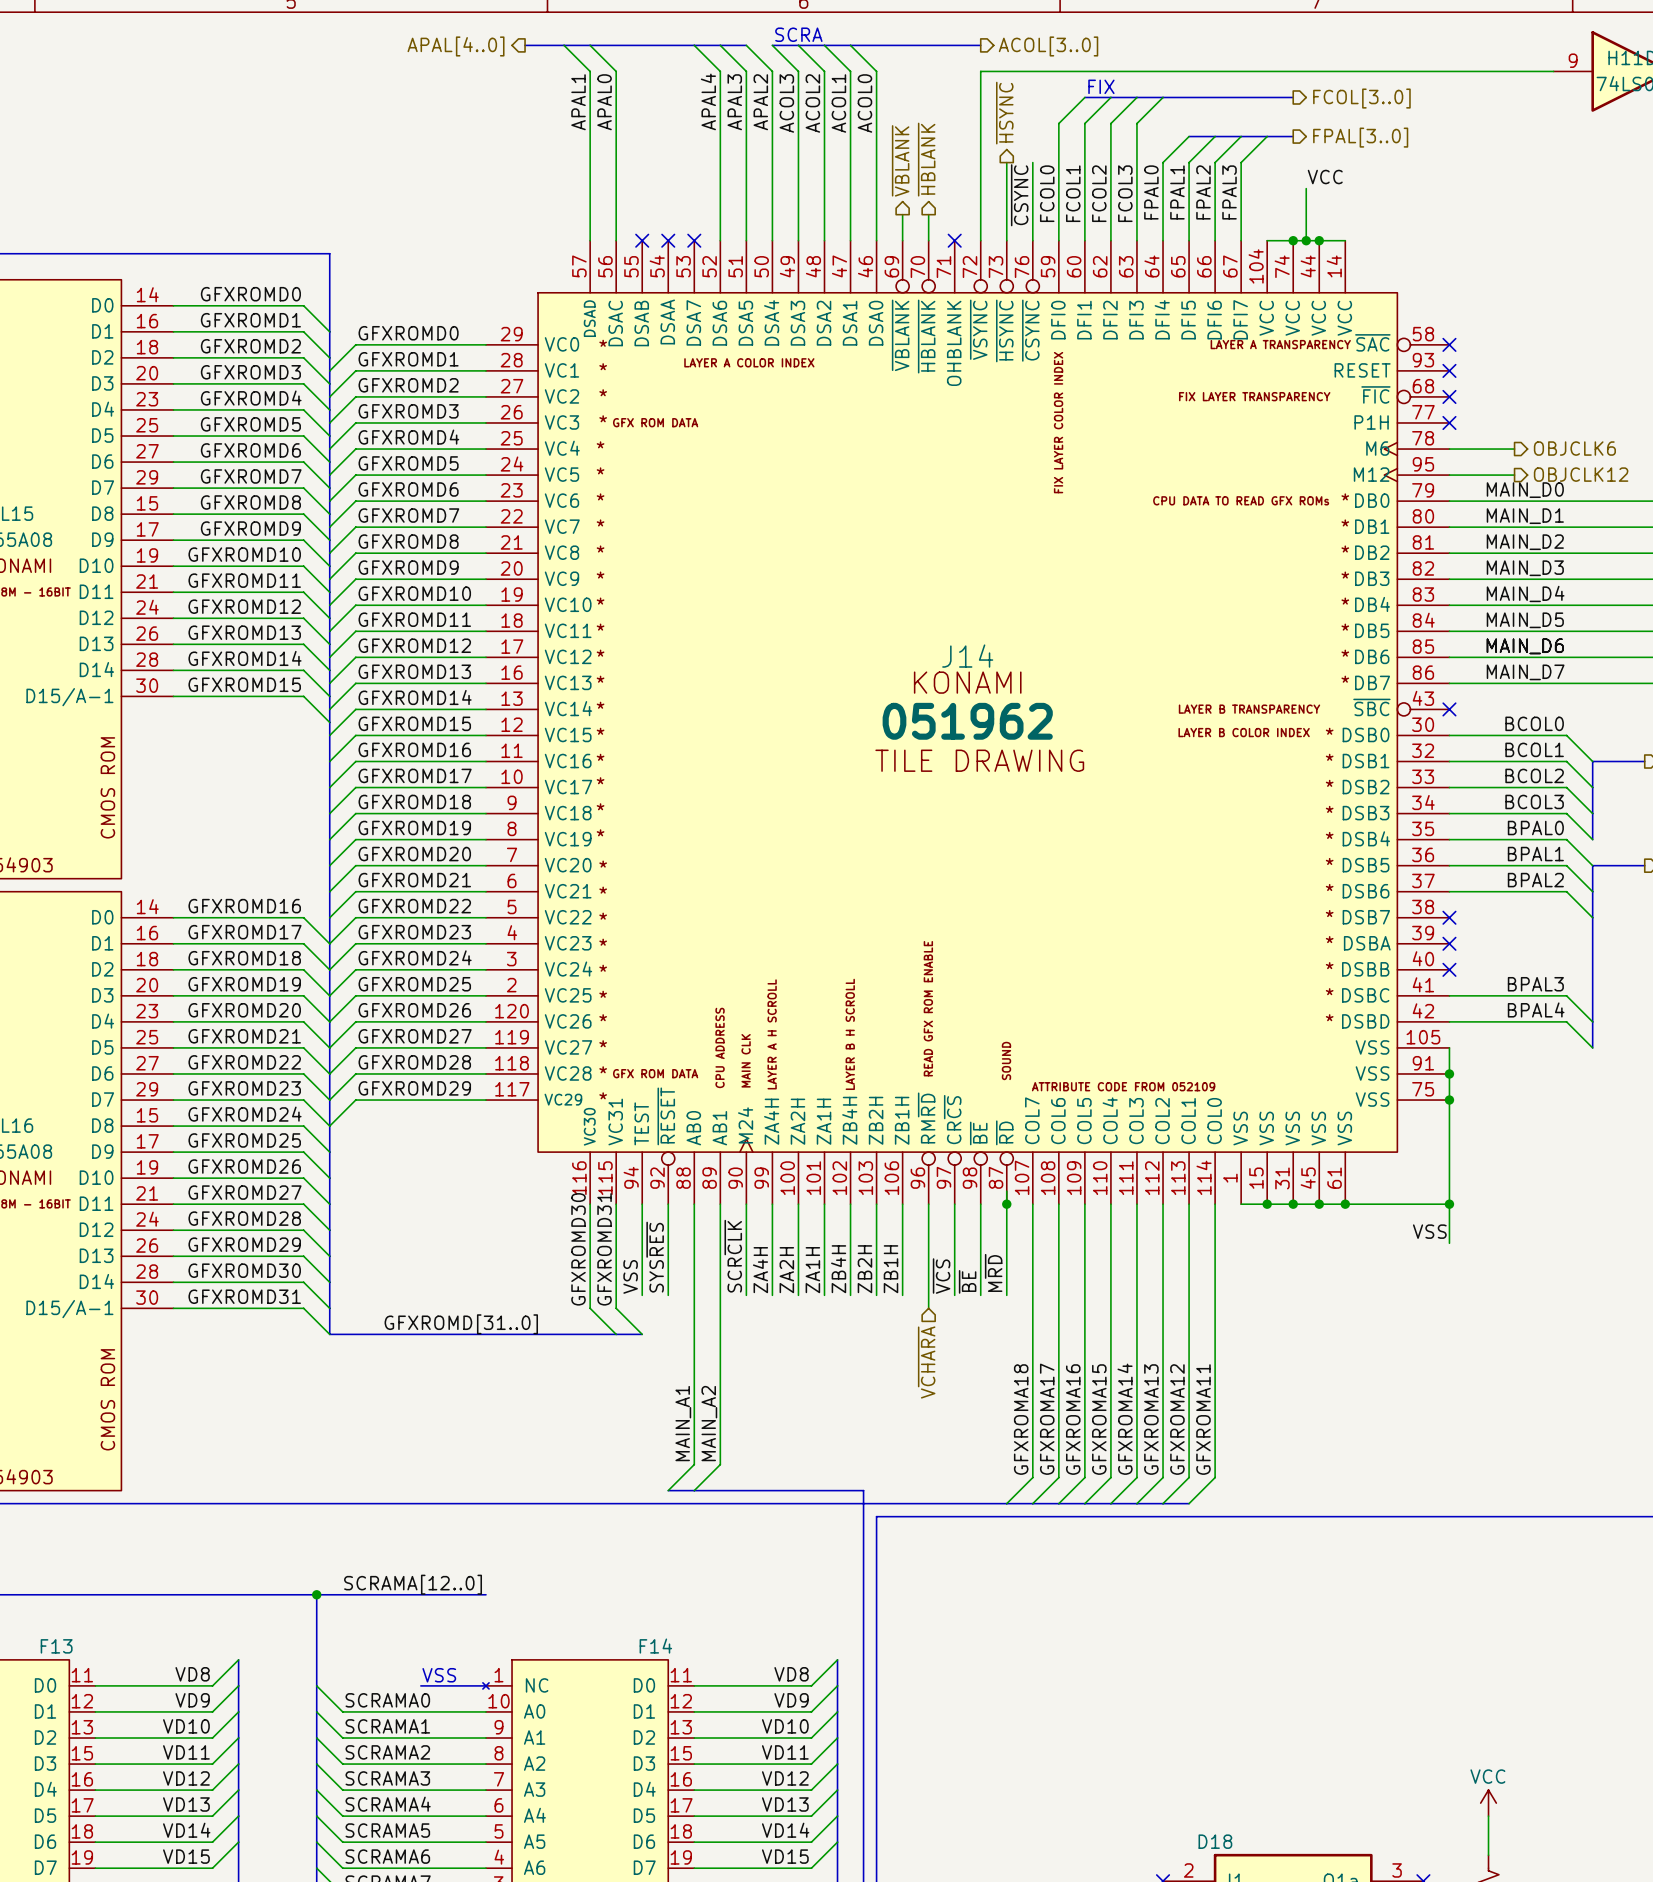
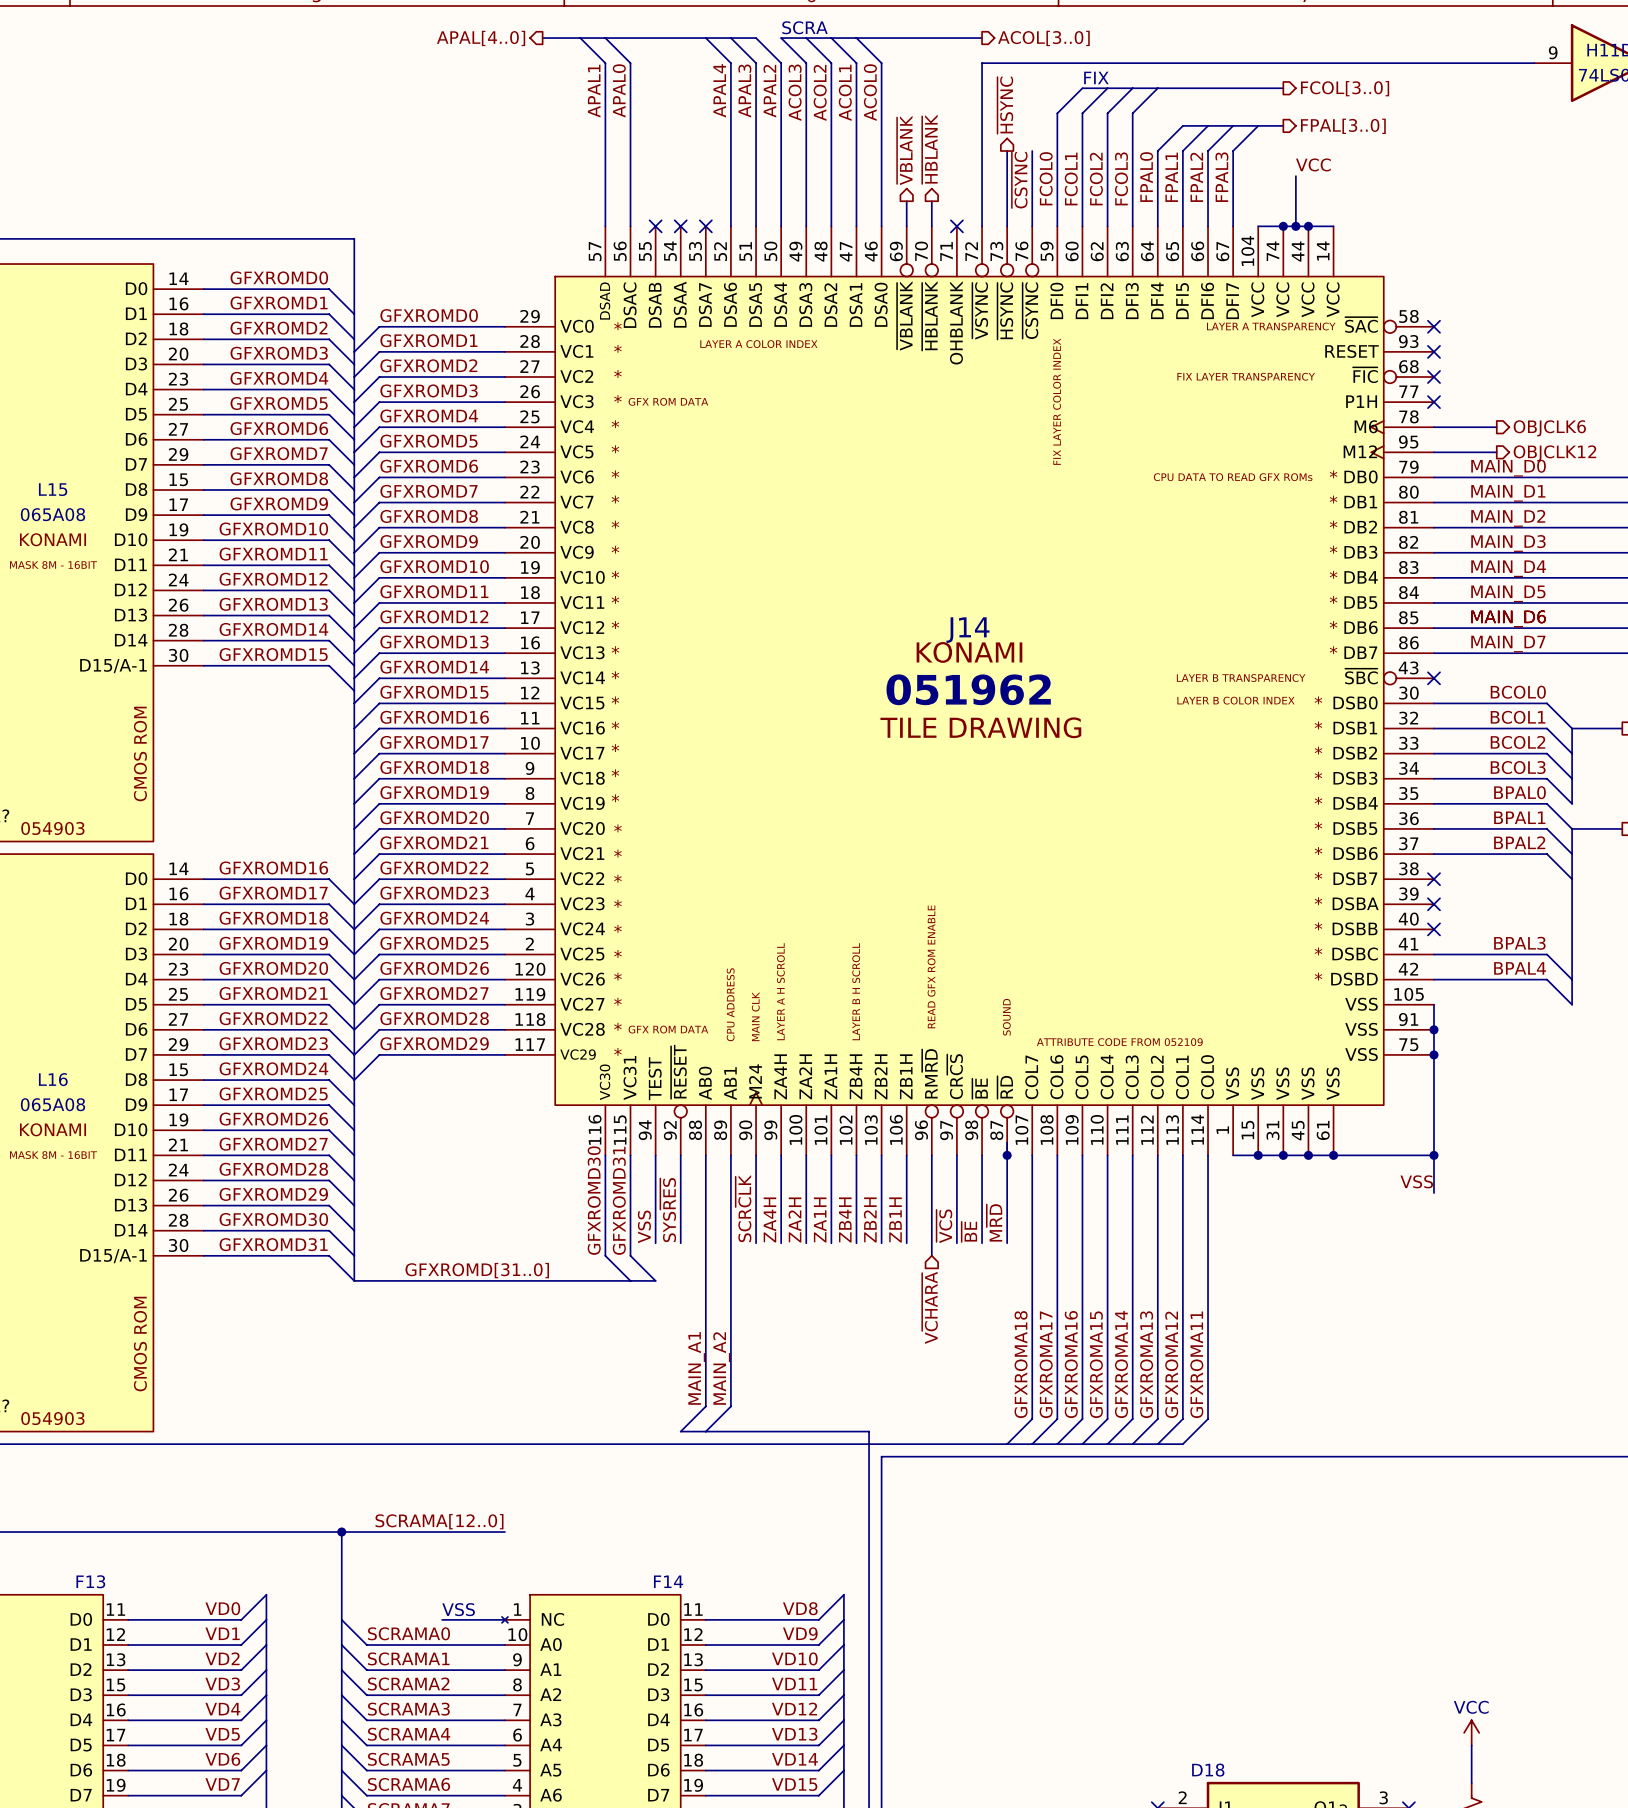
label: VD8 (192, 1674) -> VD0 (222, 1608)
label: VD9 (192, 1700) -> VD1 (222, 1633)
label: VD10 (186, 1726) -> VD2 (222, 1658)
label: VD11 (186, 1752) -> VD3 (222, 1684)
label: VD12 (186, 1778) -> VD4 (222, 1709)
label: VD13 (186, 1804) -> VD5 (222, 1734)
label: VD14 (186, 1830) -> VD6 (222, 1759)
label: VD15 (186, 1856) -> VD7 (222, 1784)

